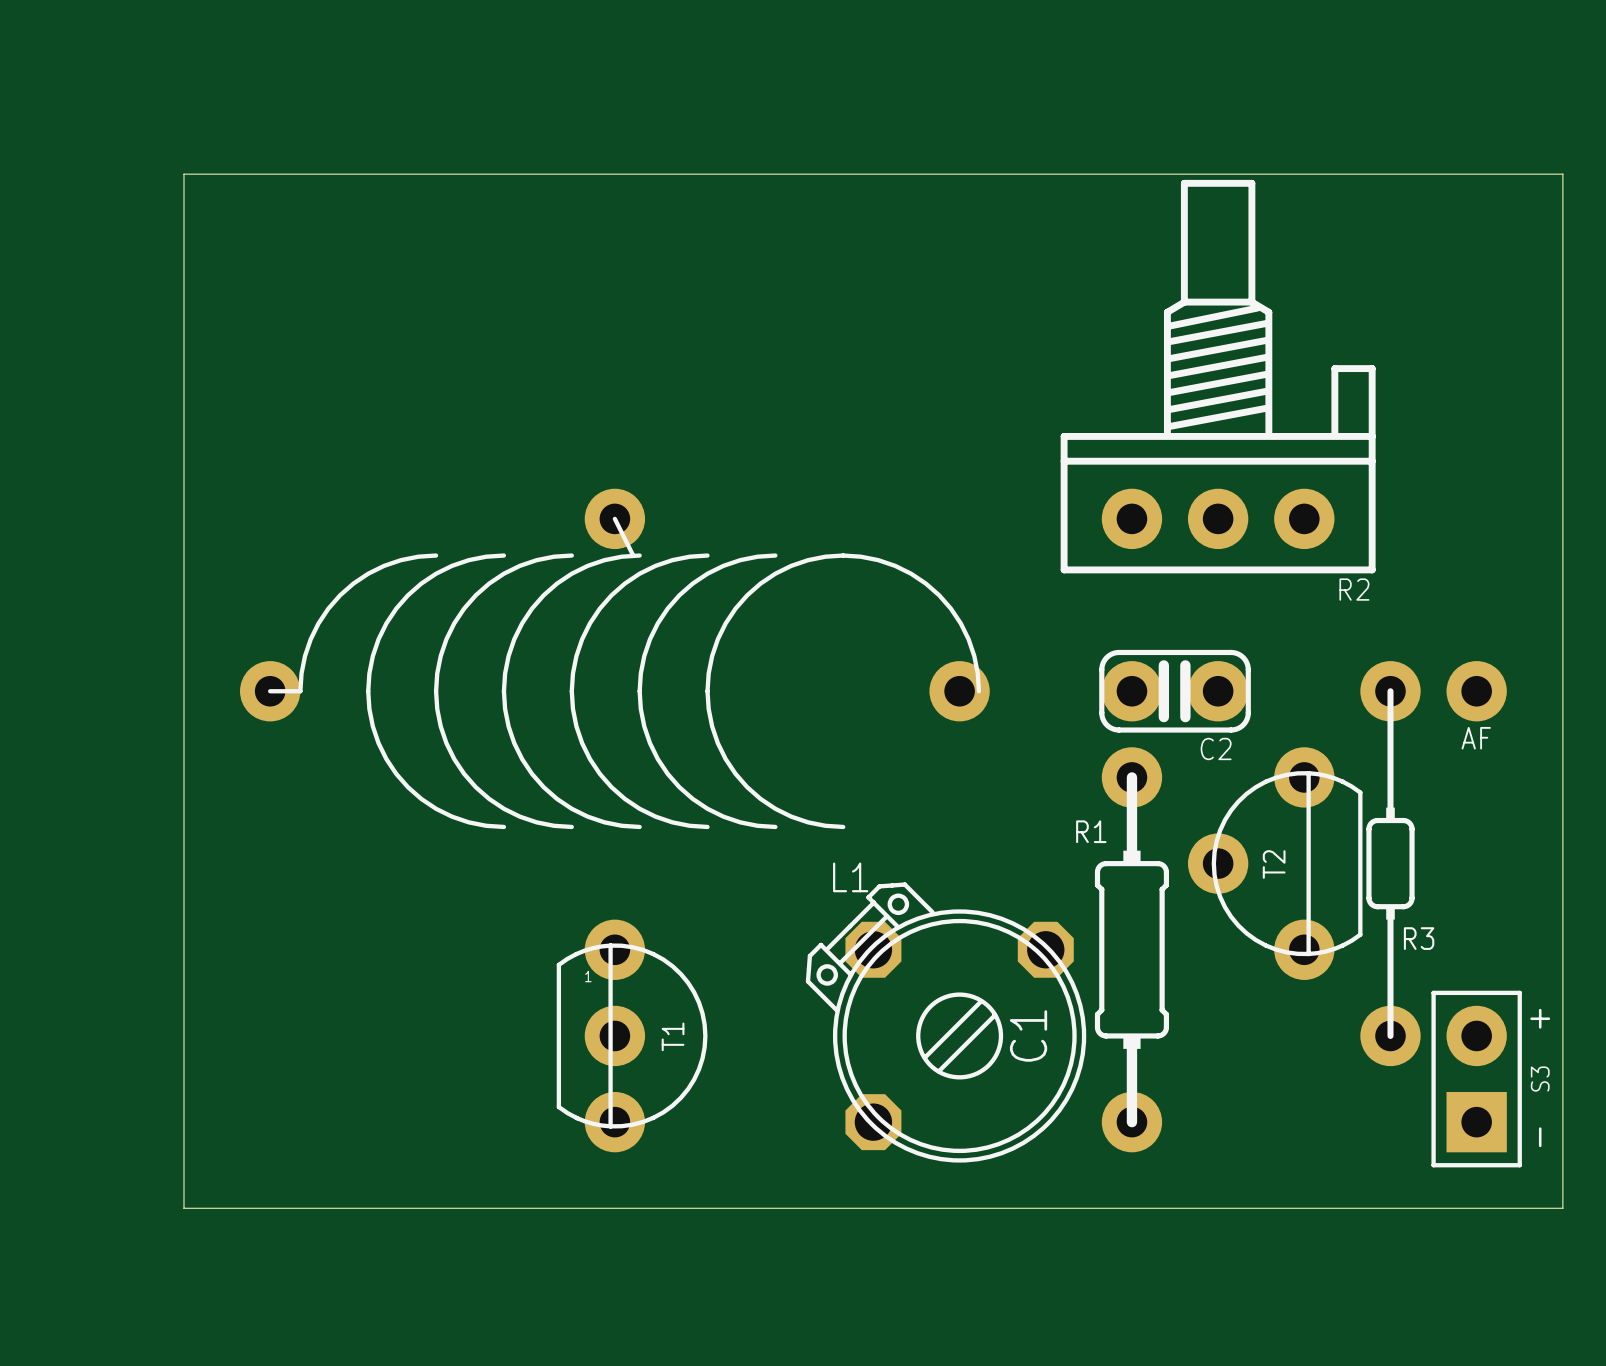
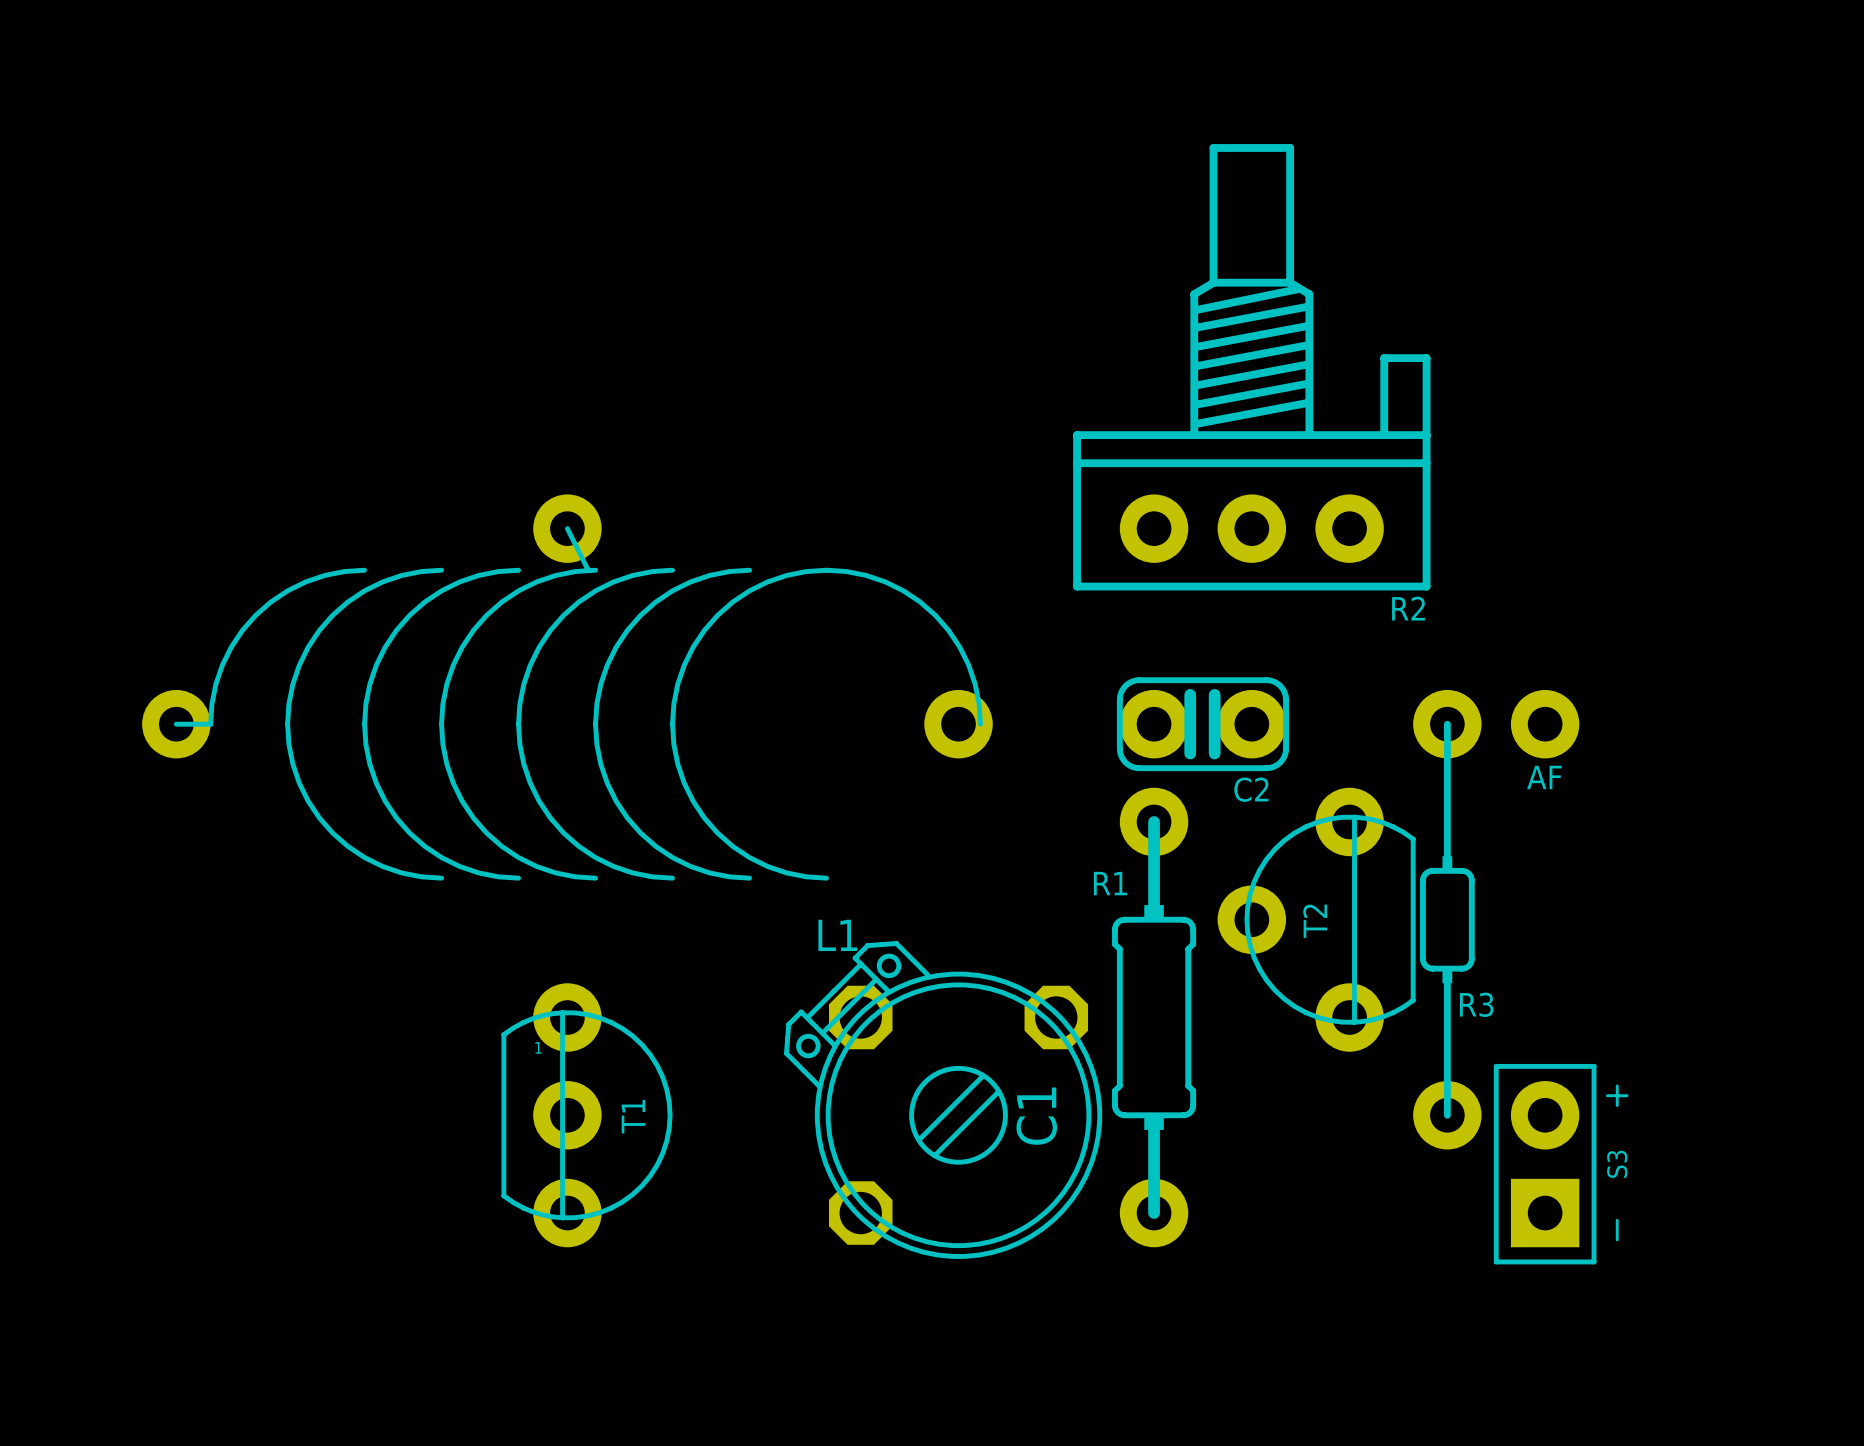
board edge: (183, 174) (1562, 174) (1562, 1208) (183, 1208) (183, 174) -> none

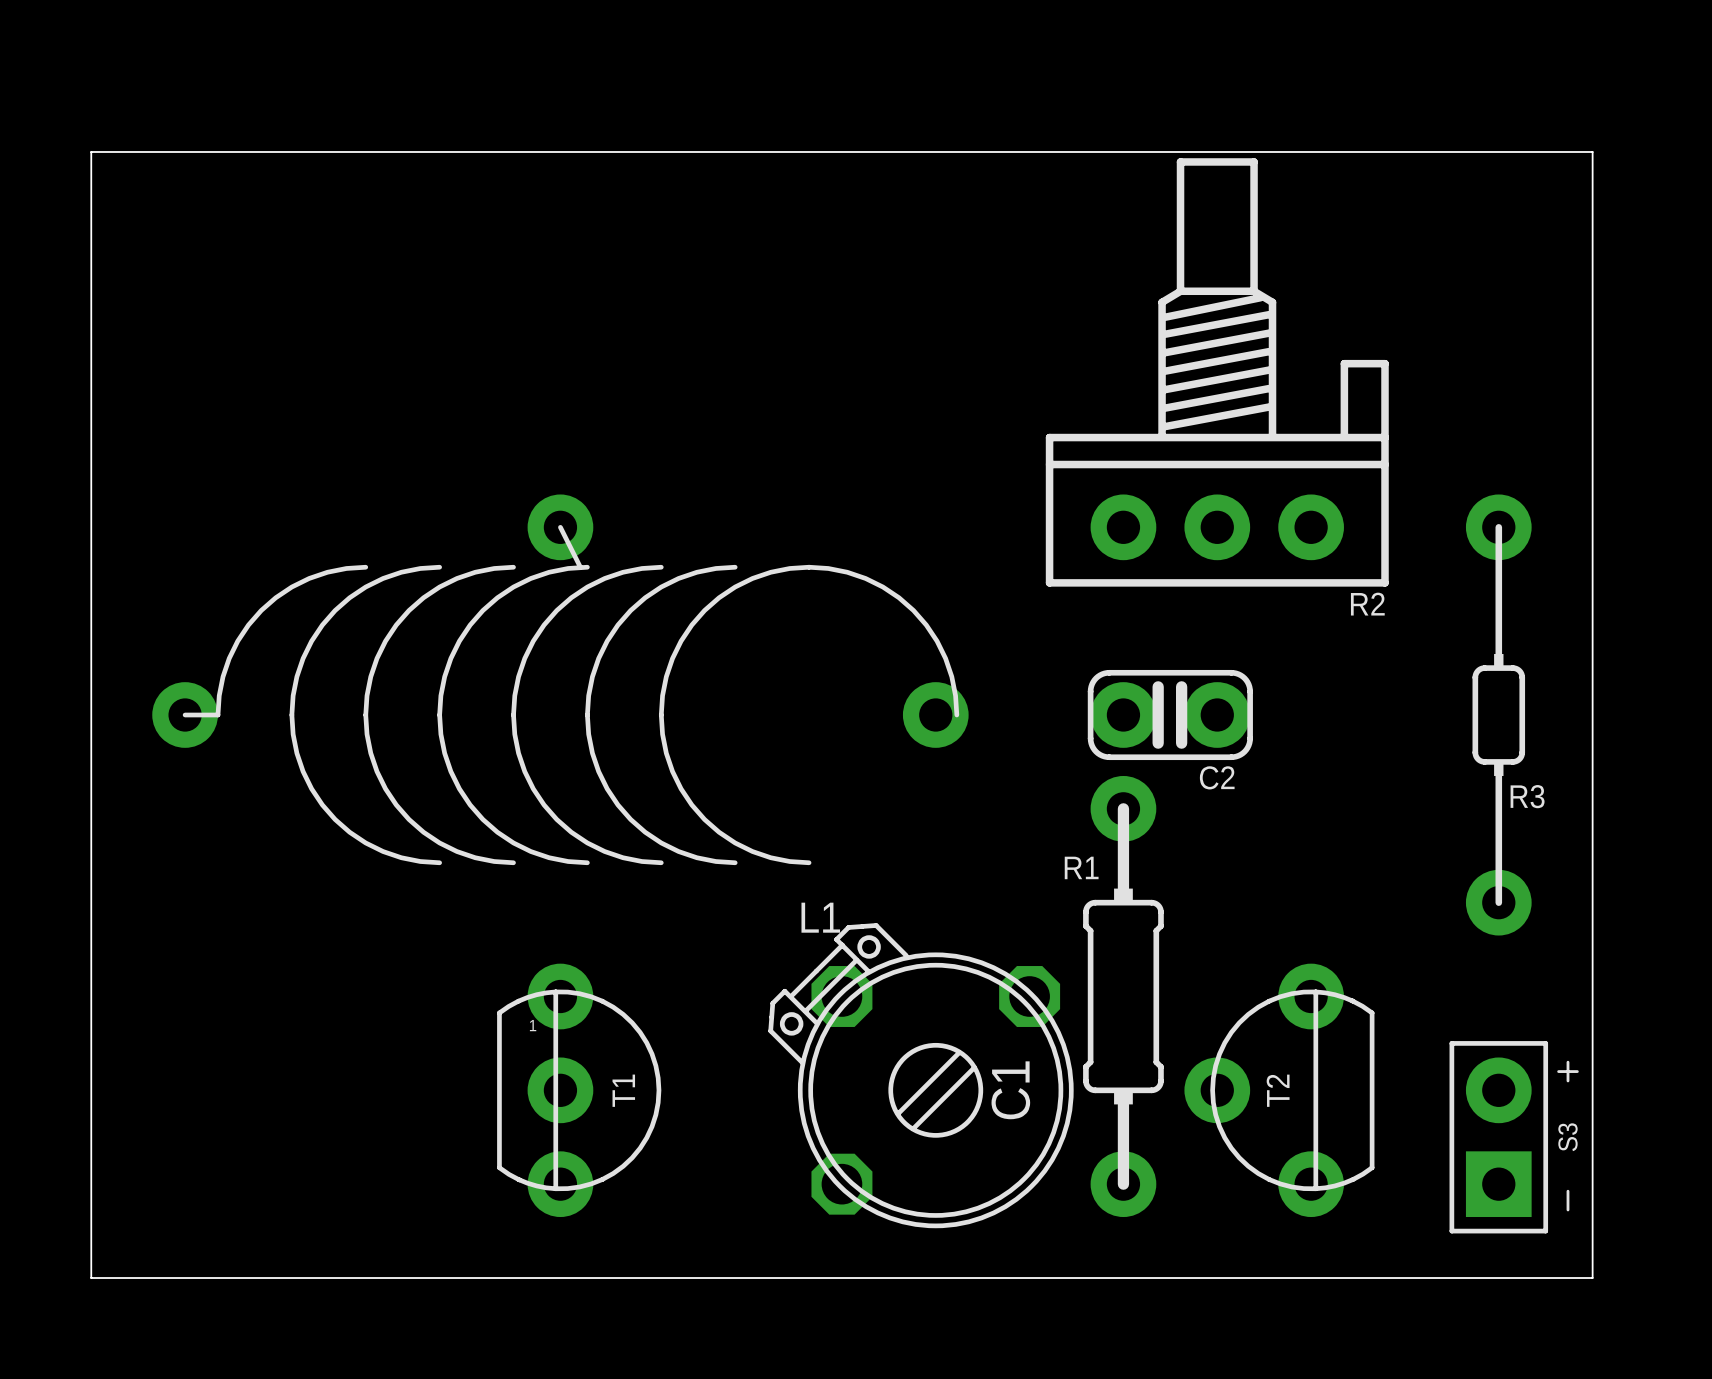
board edge: none -> (91, 151) (1592, 151) (1592, 1278) (91, 1278) (91, 151)
AF: (1545, 724) -> none
T2 position: (1316, 919) -> (1279, 1090)
R3 position: (1447, 919) -> (1498, 715)

